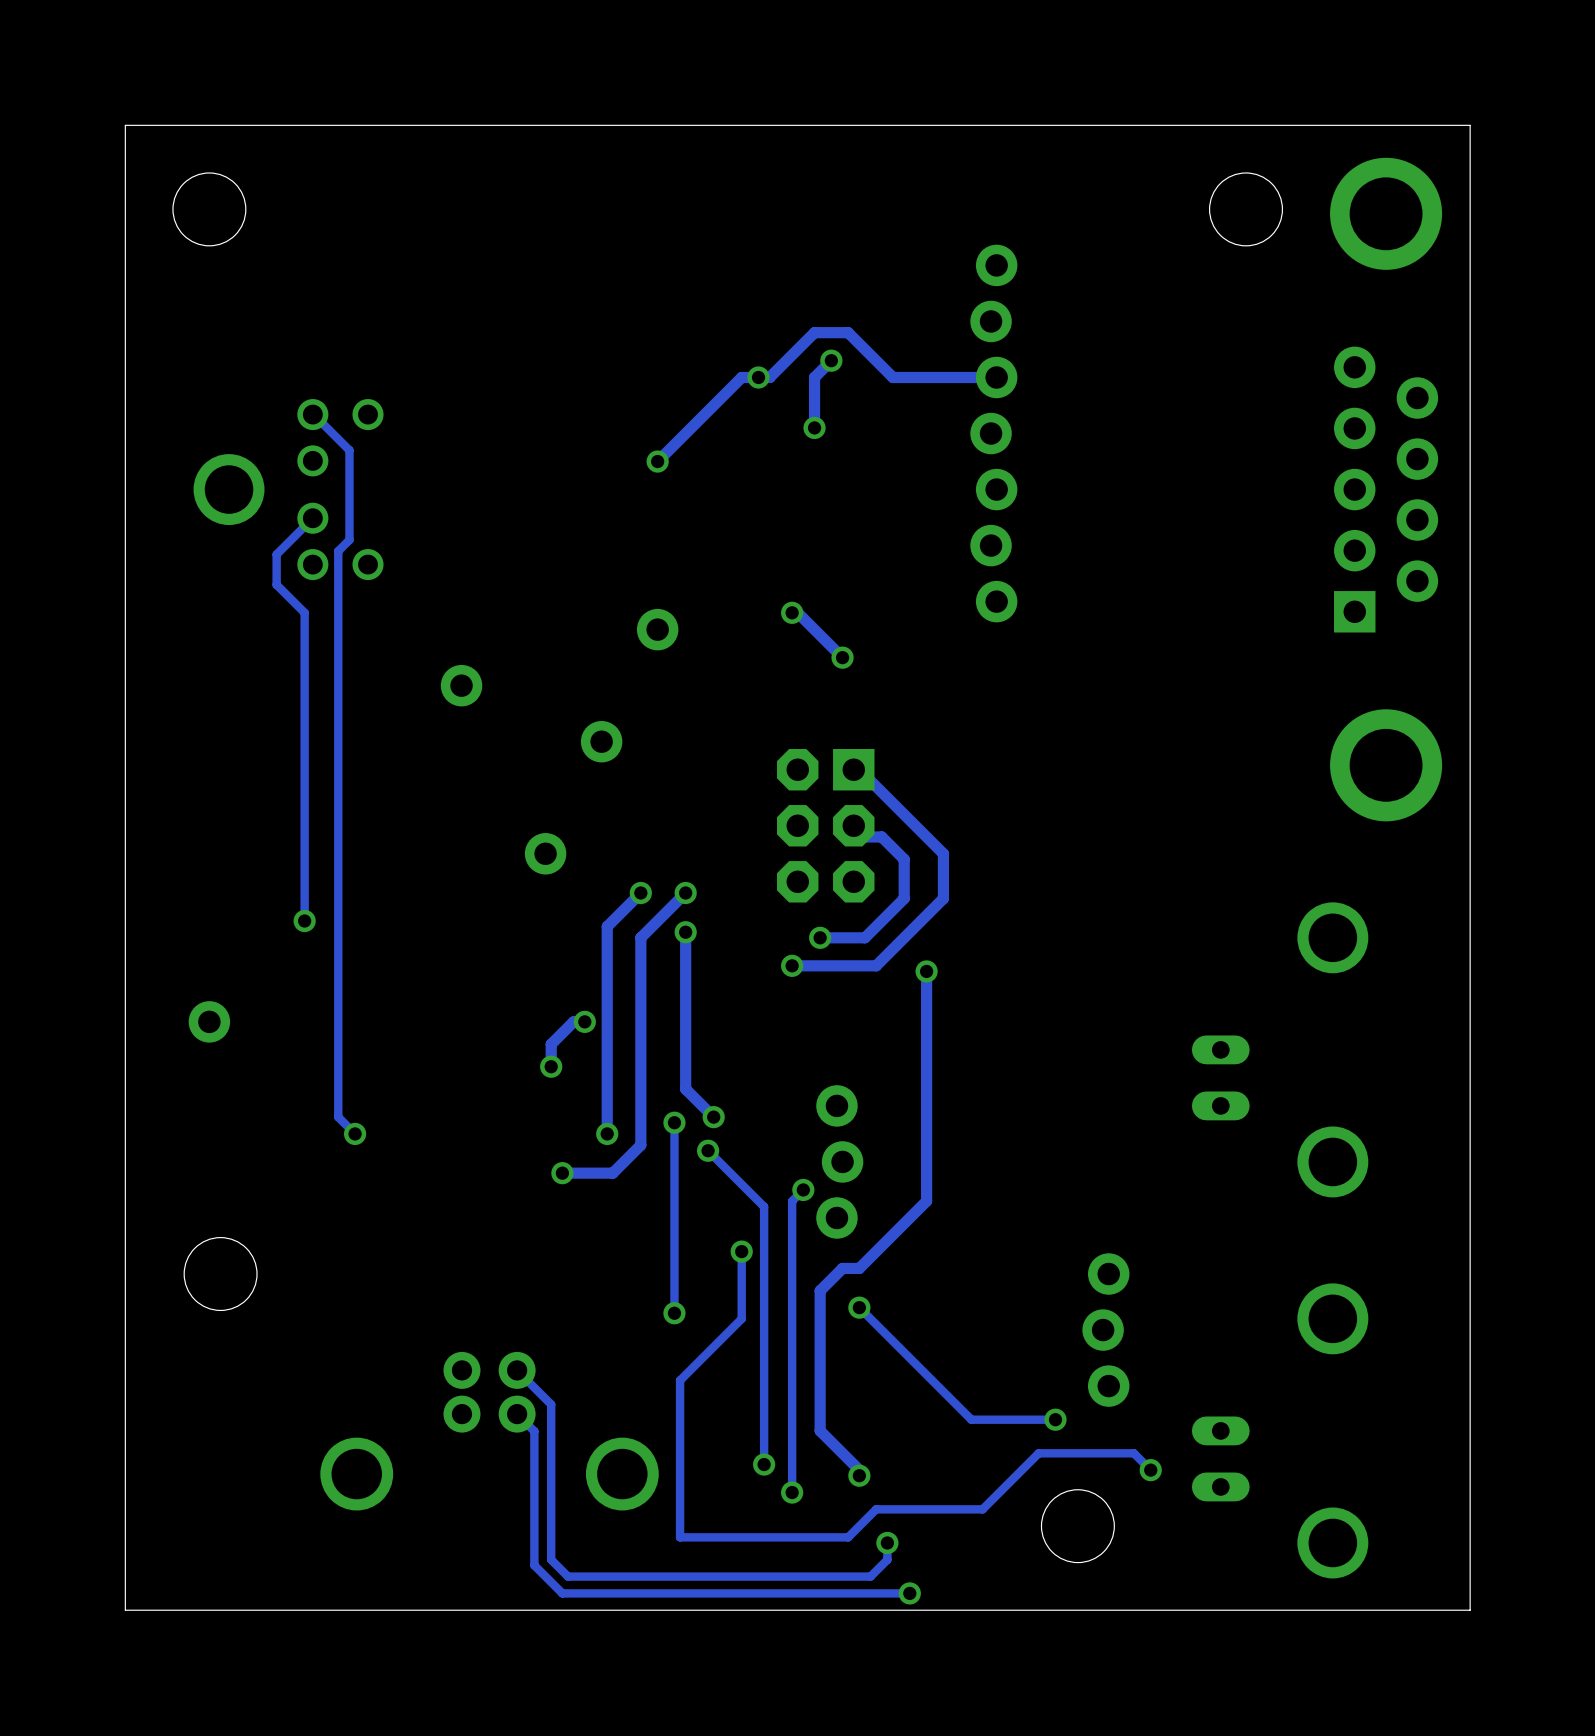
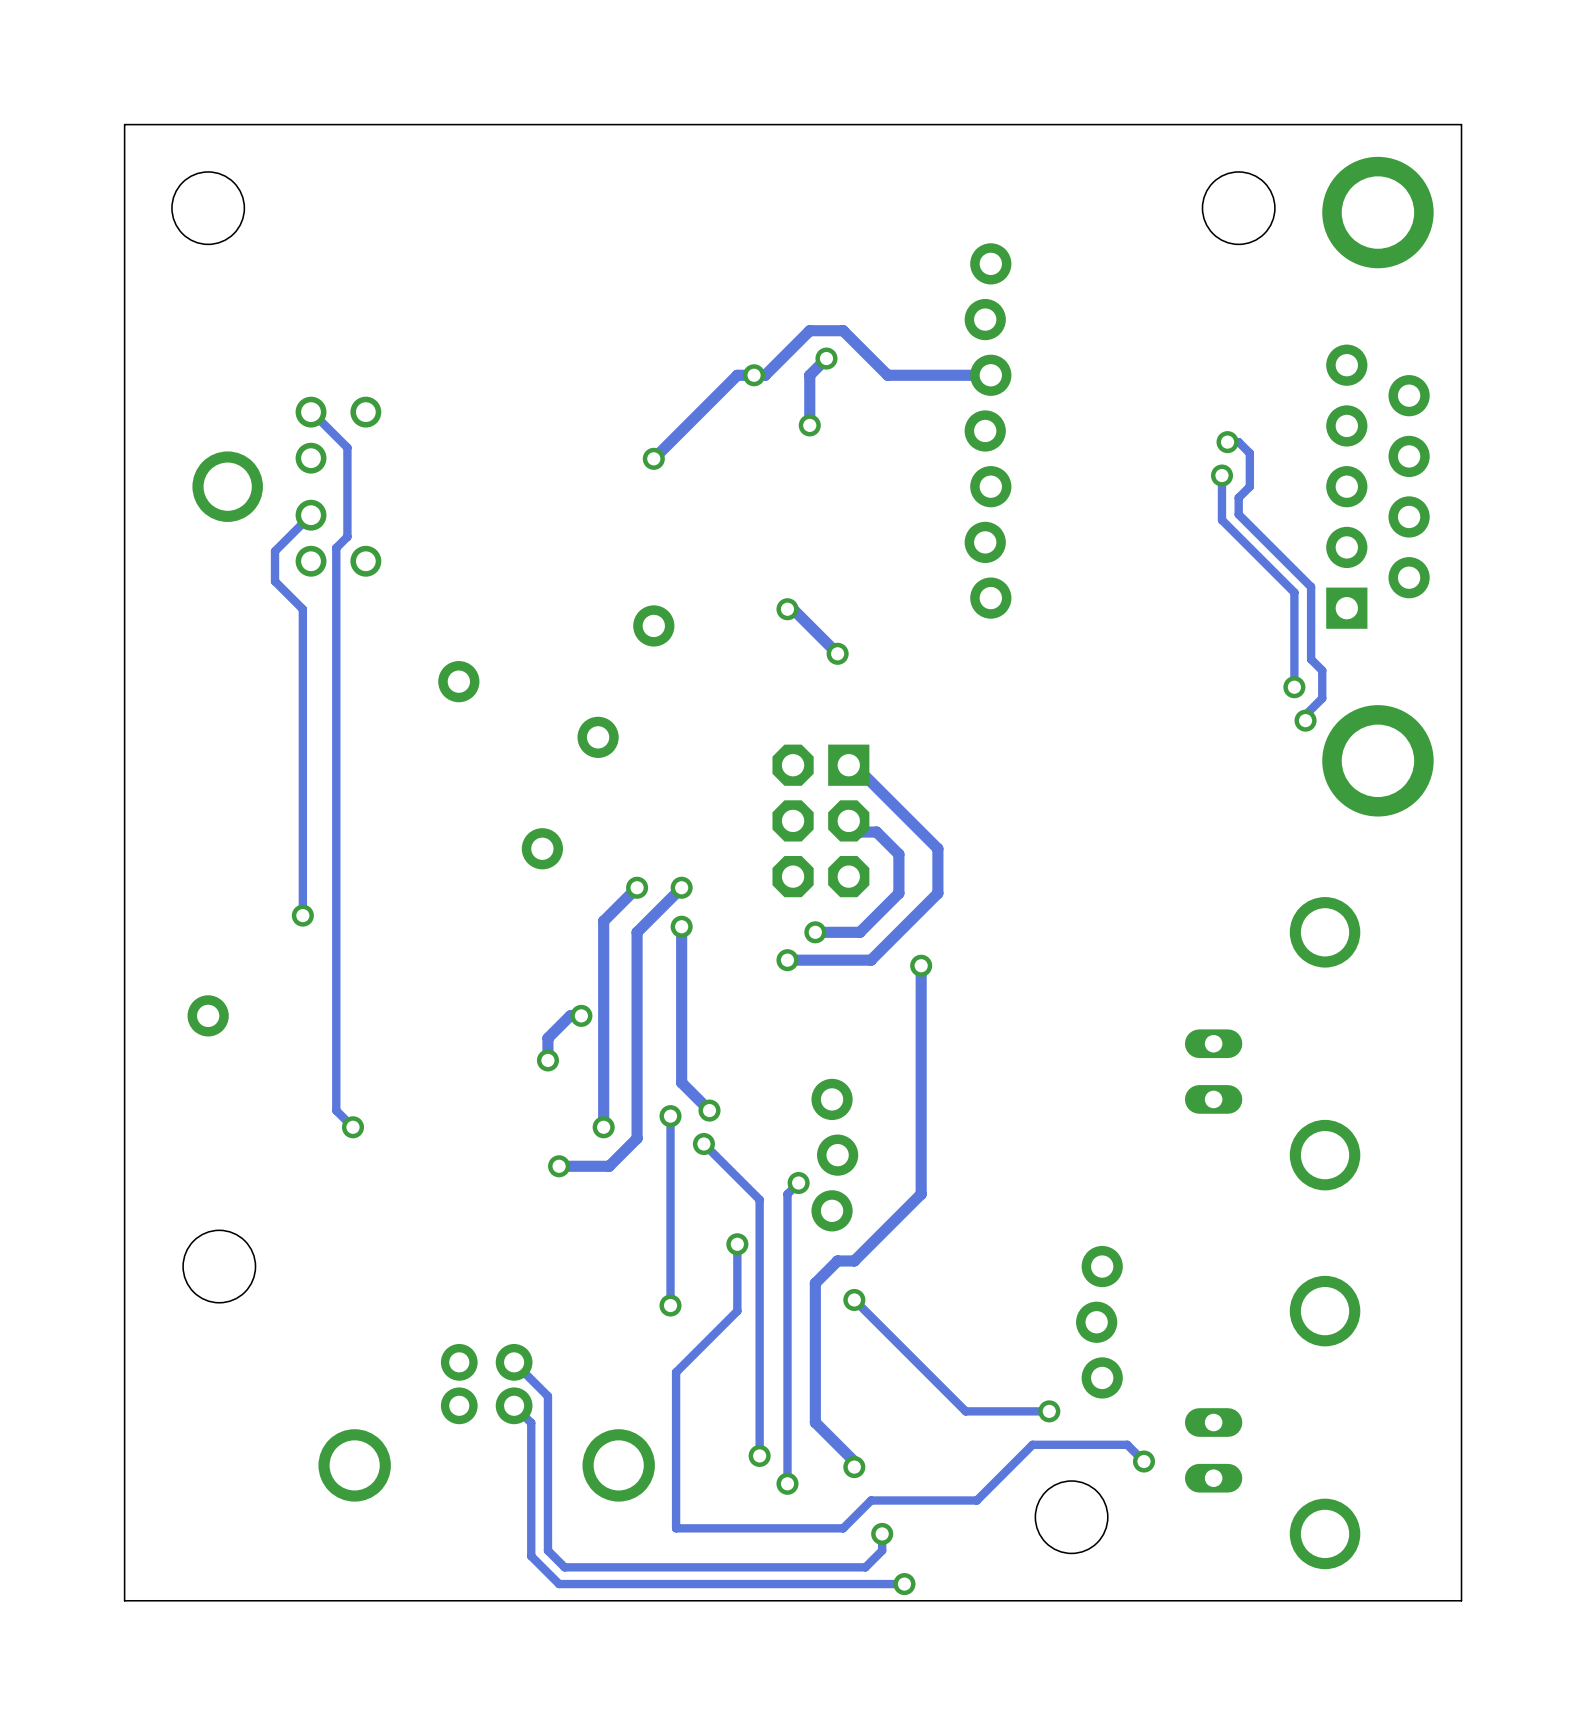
track: none -> (1227, 442) (1238, 442) (1249, 453) (1249, 486) (1238, 497) (1238, 514) (1311, 586) (1311, 659) (1322, 670) (1322, 698) (1305, 715) (1305, 720)
via: none -> (1227, 442)
track: none -> (1221, 475) (1221, 520) (1294, 592) (1294, 687)
via: none -> (1221, 475)
via: none -> (1294, 687)
via: none -> (1305, 720)

